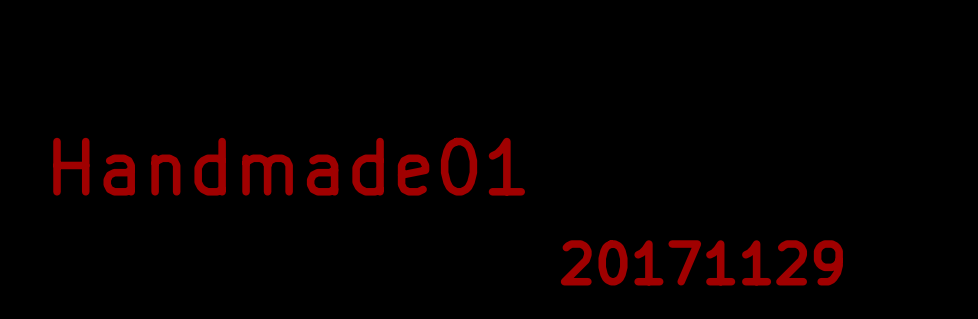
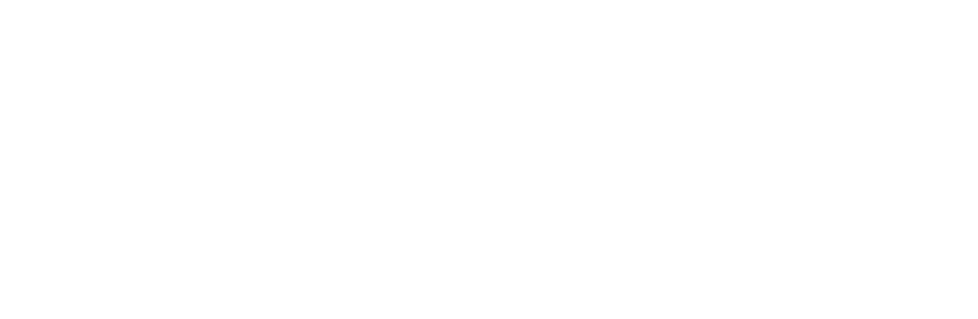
text: Handmade01 (289, 166) -> none
text: 20171129 (701, 262) -> none

